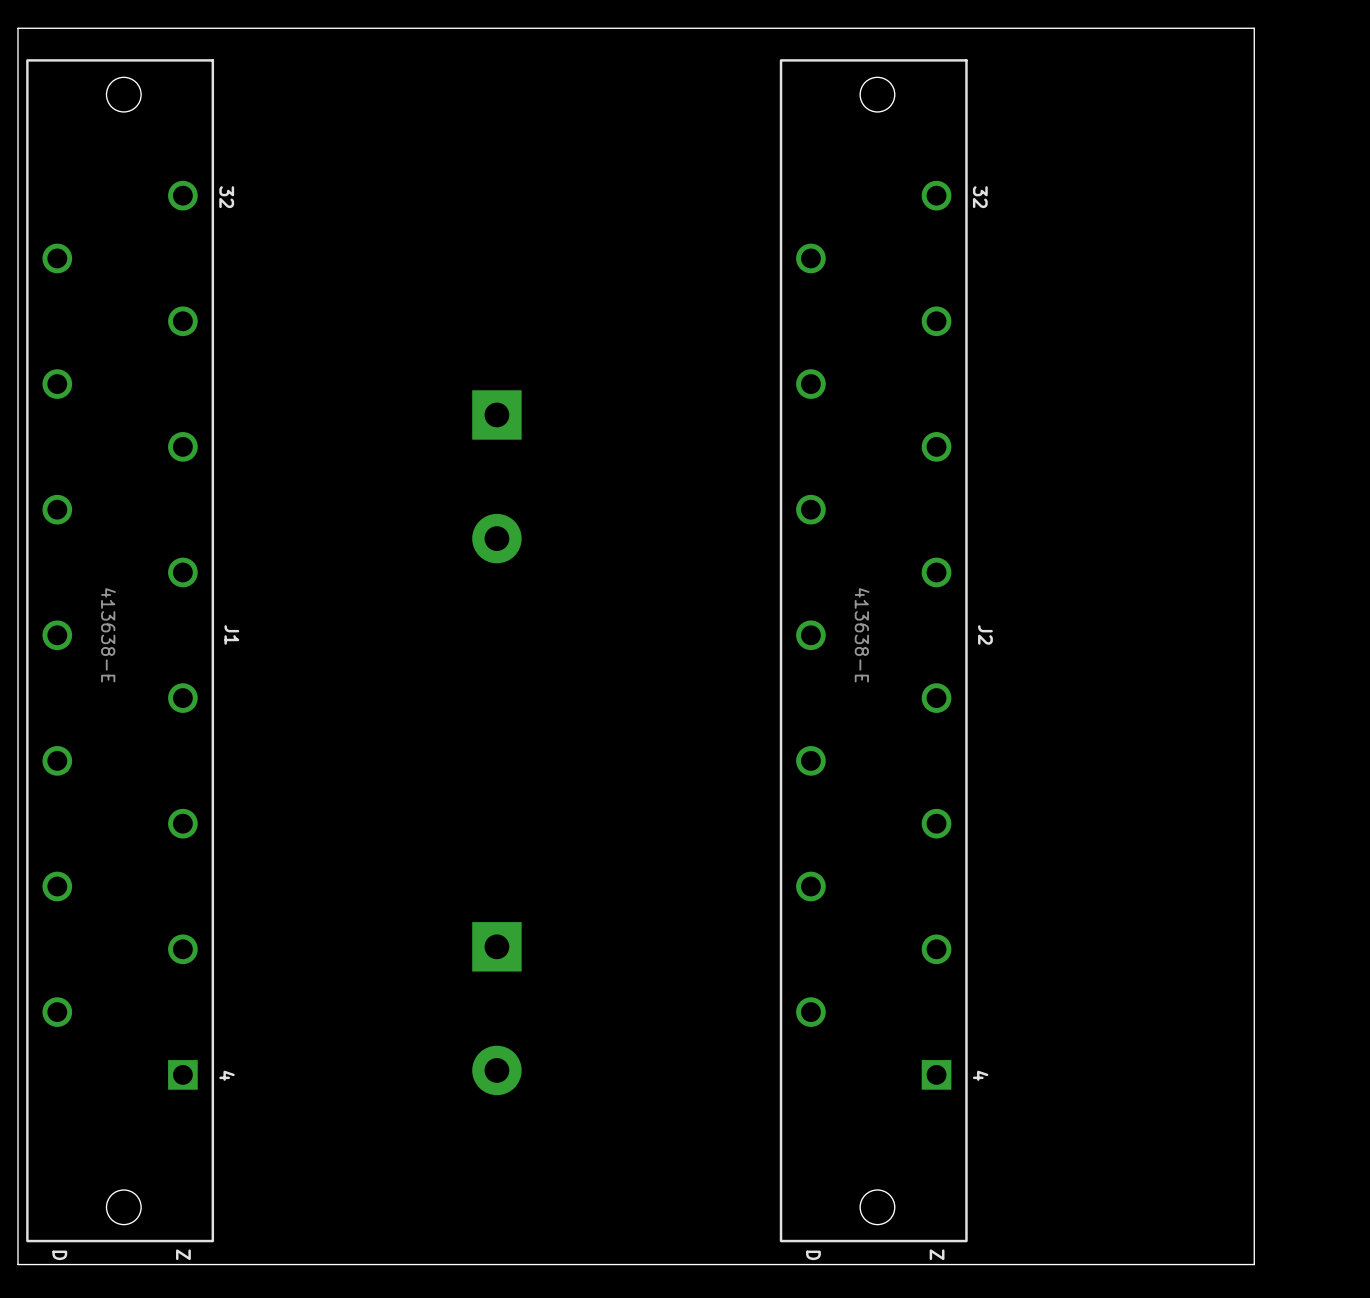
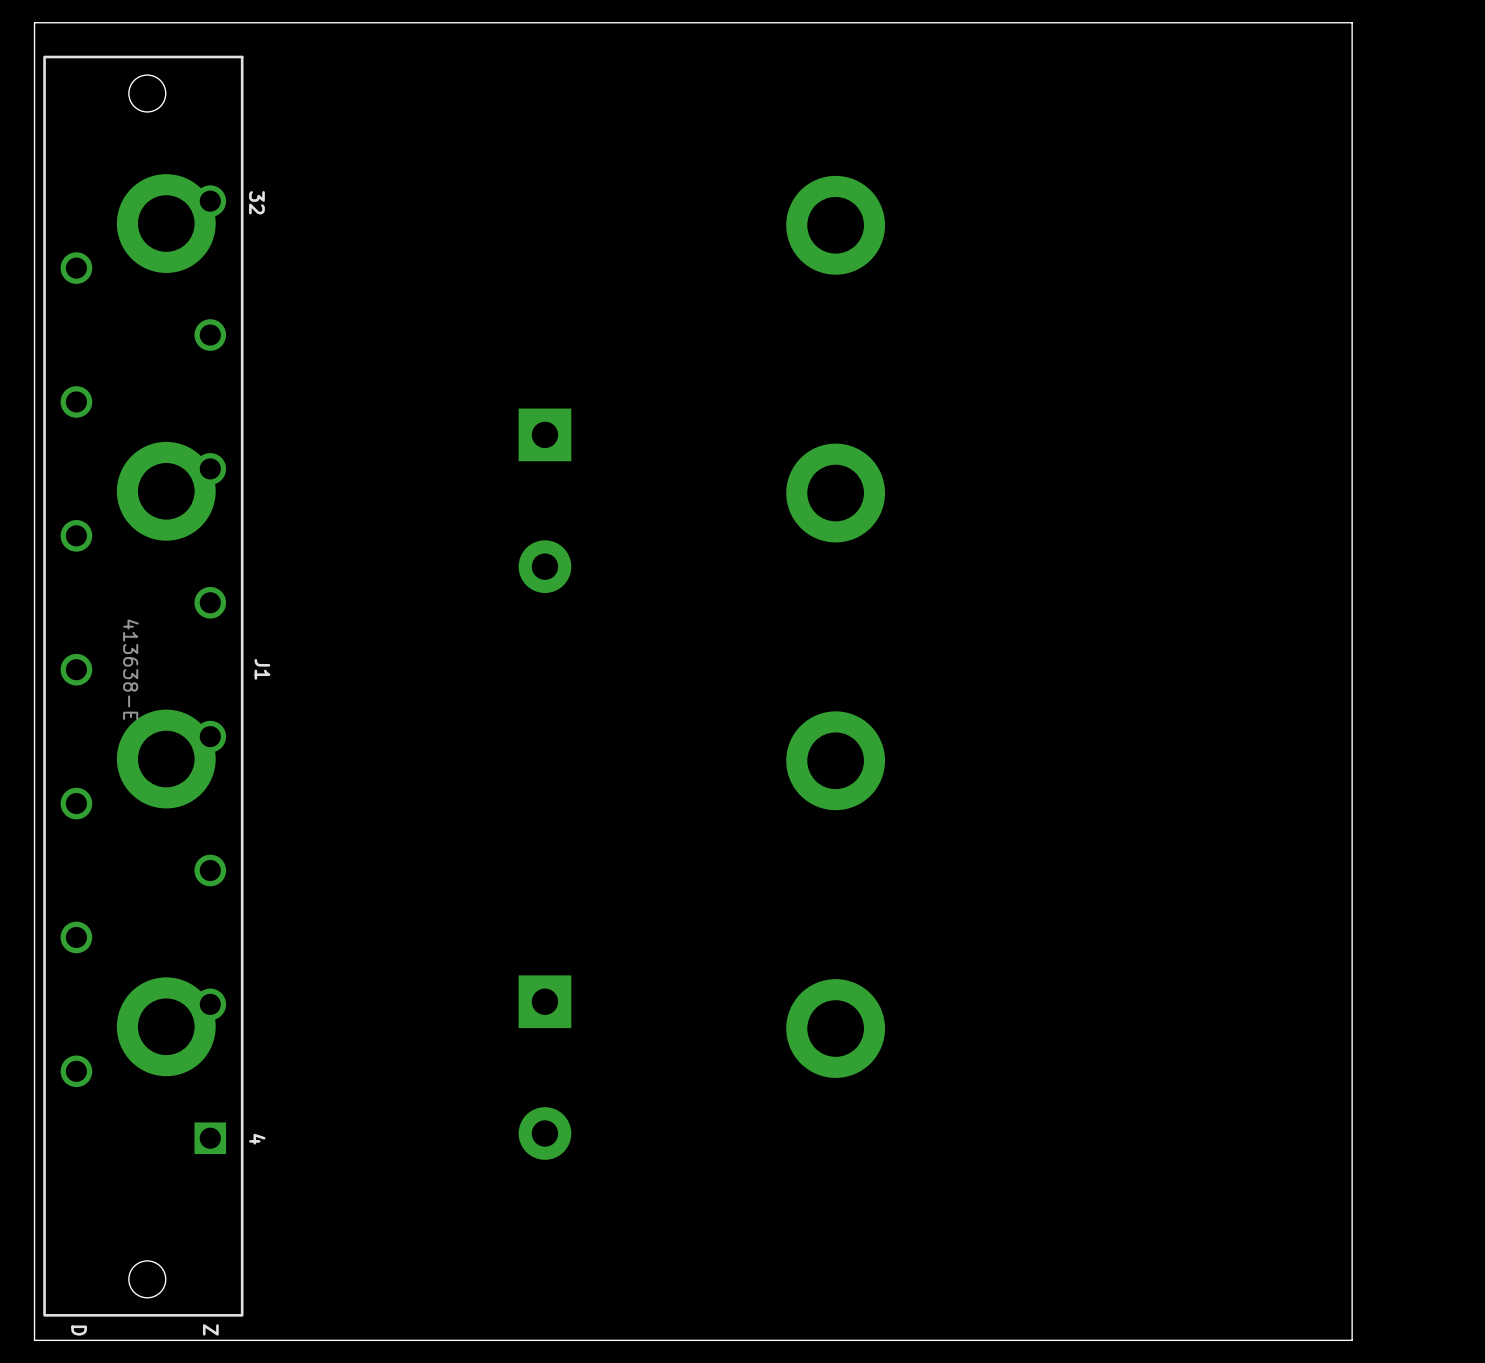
part: none -> (166, 223)
part: none -> (835, 225)
part: none -> (166, 491)
part: none -> (835, 493)
J2: 413638-E (873, 650) -> none
part: none -> (166, 759)
part: none -> (835, 760)
part: none -> (166, 1026)
part: none -> (835, 1028)

